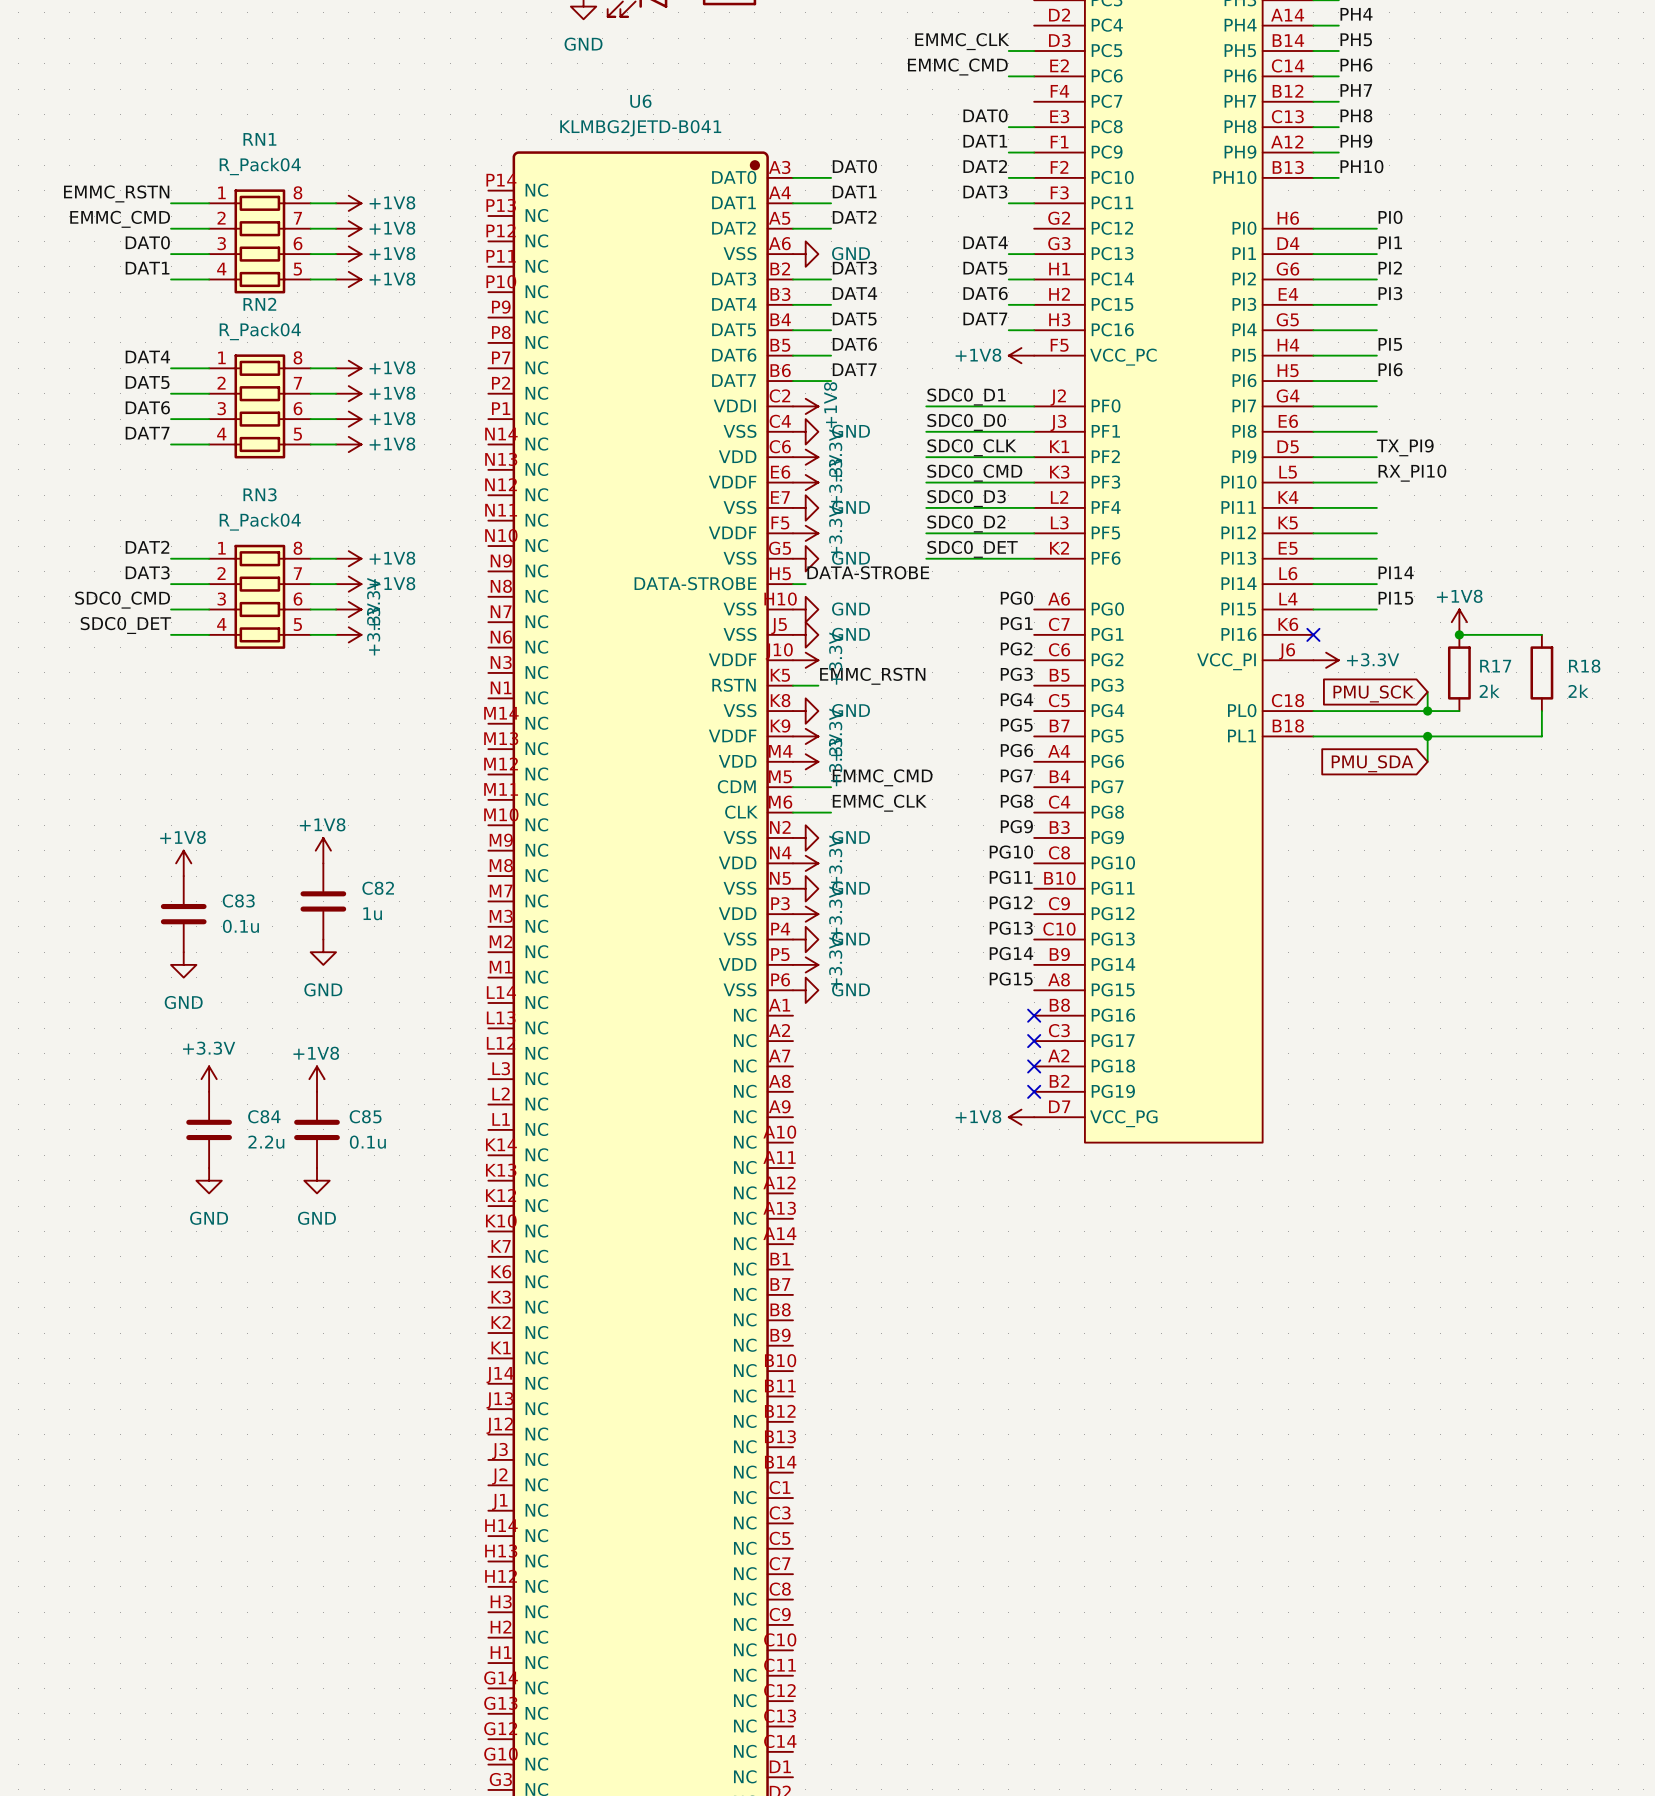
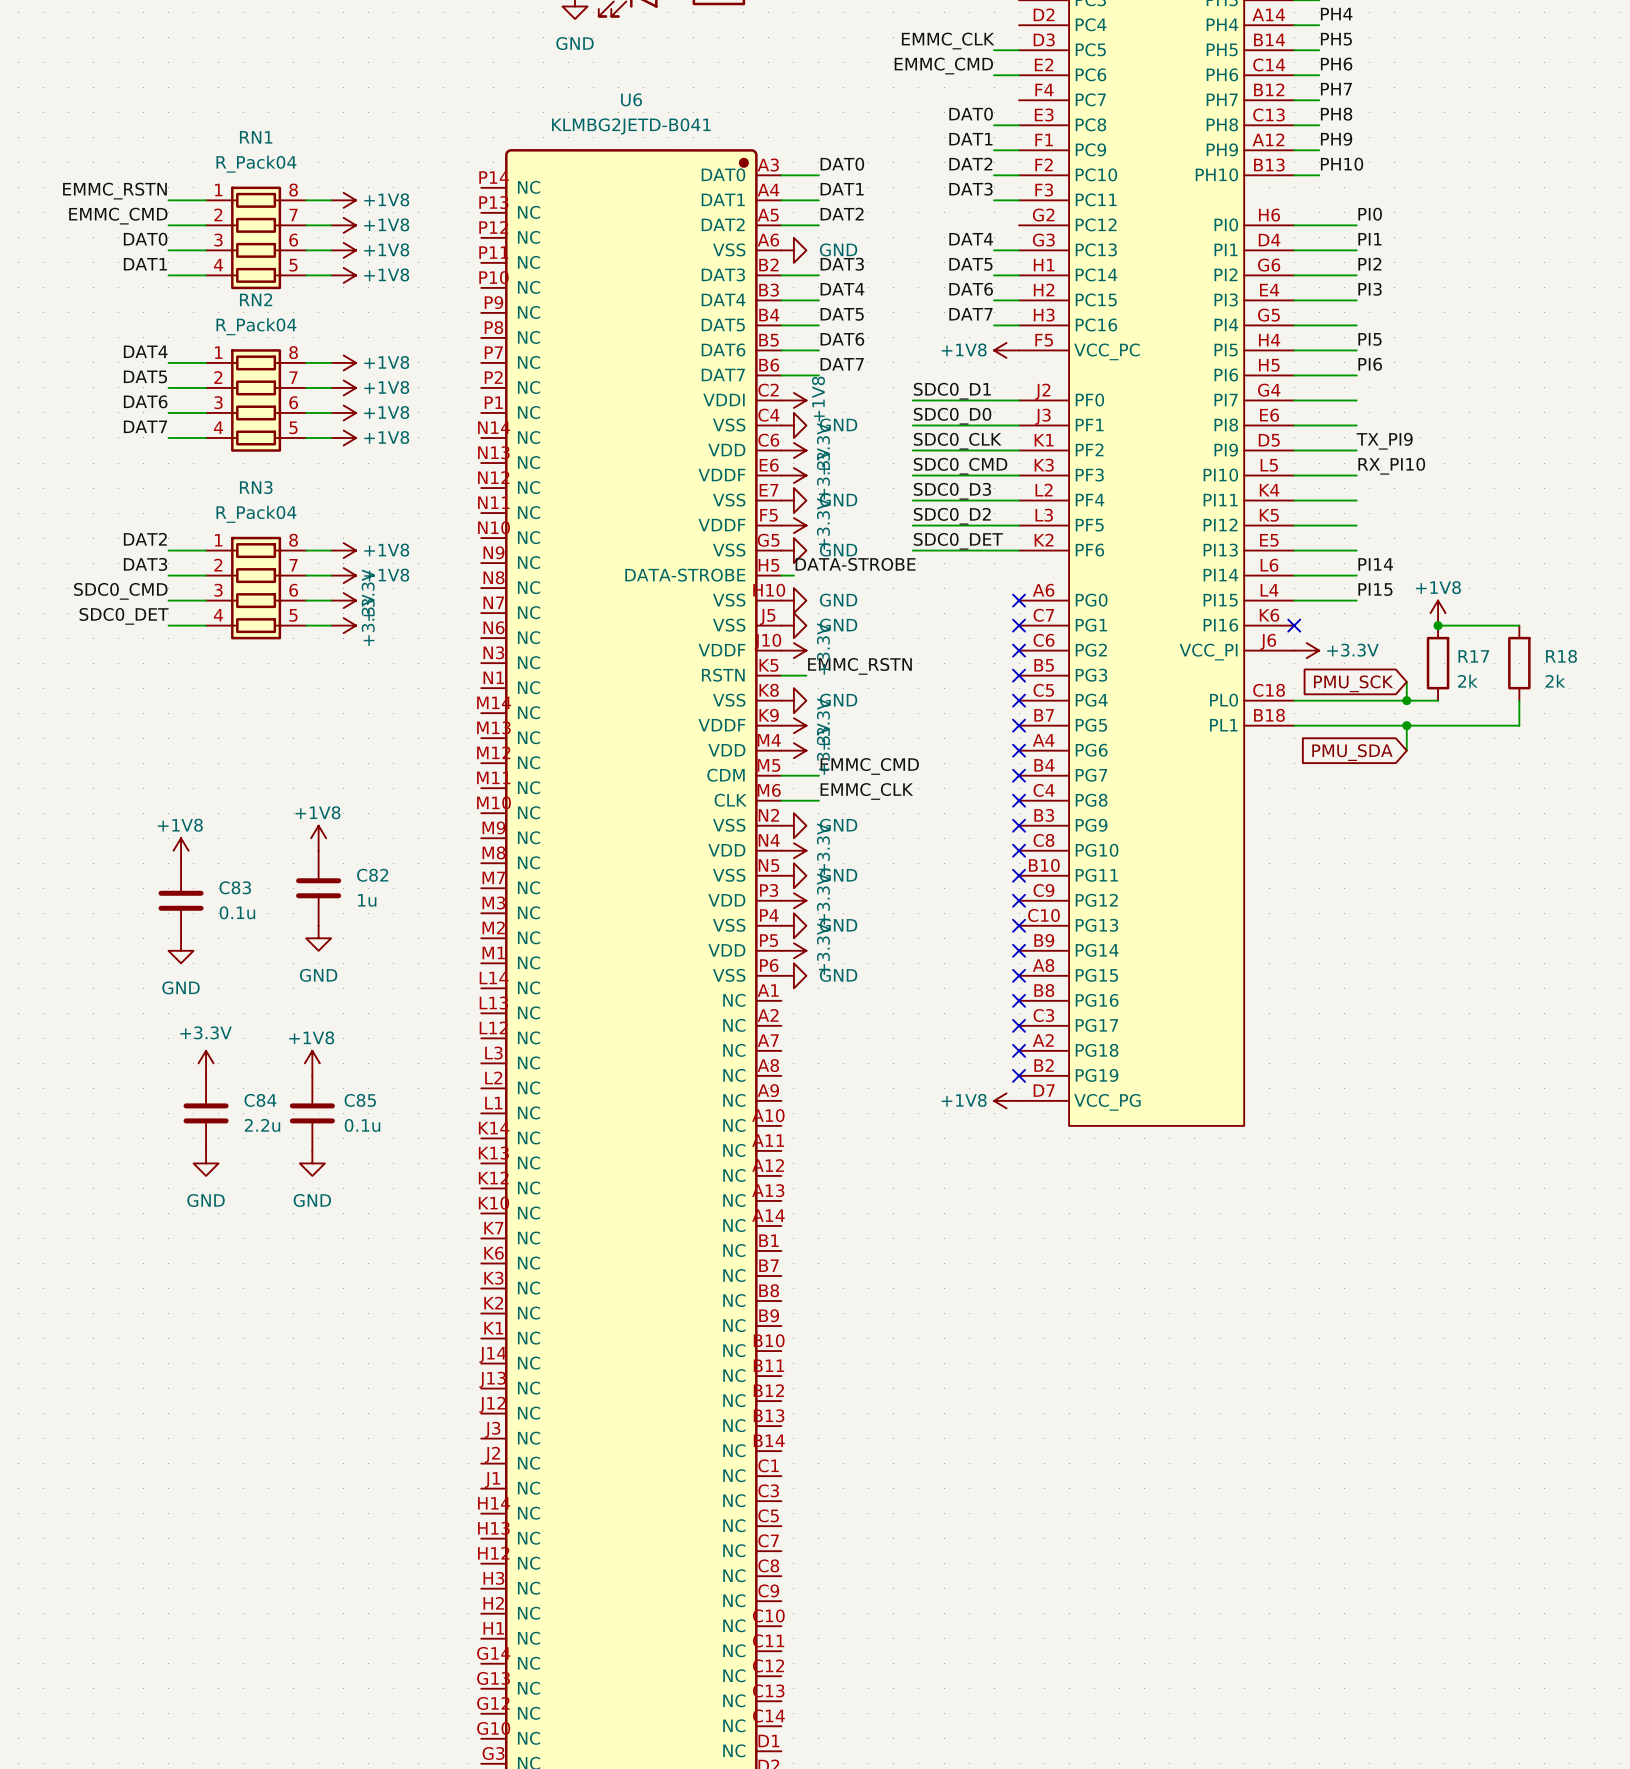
label: PG0 (1016, 598) -> none
no-connect mark: none -> (1019, 600)
label: PG1 (1016, 623) -> none
no-connect mark: none -> (1019, 625)
label: PG2 (1016, 648) -> none
no-connect mark: none -> (1019, 650)
label: PG3 (1016, 674) -> none
no-connect mark: none -> (1019, 675)
label: PG4 (1017, 699) -> none
no-connect mark: none -> (1019, 700)
label: PG5 (1016, 725) -> none
no-connect mark: none -> (1019, 725)
label: PG6 (1016, 750) -> none
no-connect mark: none -> (1019, 750)
label: PG7 (1016, 775) -> none
no-connect mark: none -> (1019, 775)
label: PG8 (1016, 801) -> none
no-connect mark: none -> (1019, 800)
label: PG9 (1016, 826) -> none
no-connect mark: none -> (1019, 825)
label: PG10 (1011, 852) -> none
no-connect mark: none -> (1019, 850)
label: PG11 (1011, 877) -> none
no-connect mark: none -> (1019, 875)
label: PG12 (1011, 902) -> none
no-connect mark: none -> (1019, 900)
label: PG13 (1011, 928) -> none
no-connect mark: none -> (1019, 925)
label: PG14 (1011, 953) -> none
no-connect mark: none -> (1019, 950)
label: PG15 (1011, 978) -> none
no-connect mark: none -> (1019, 975)

